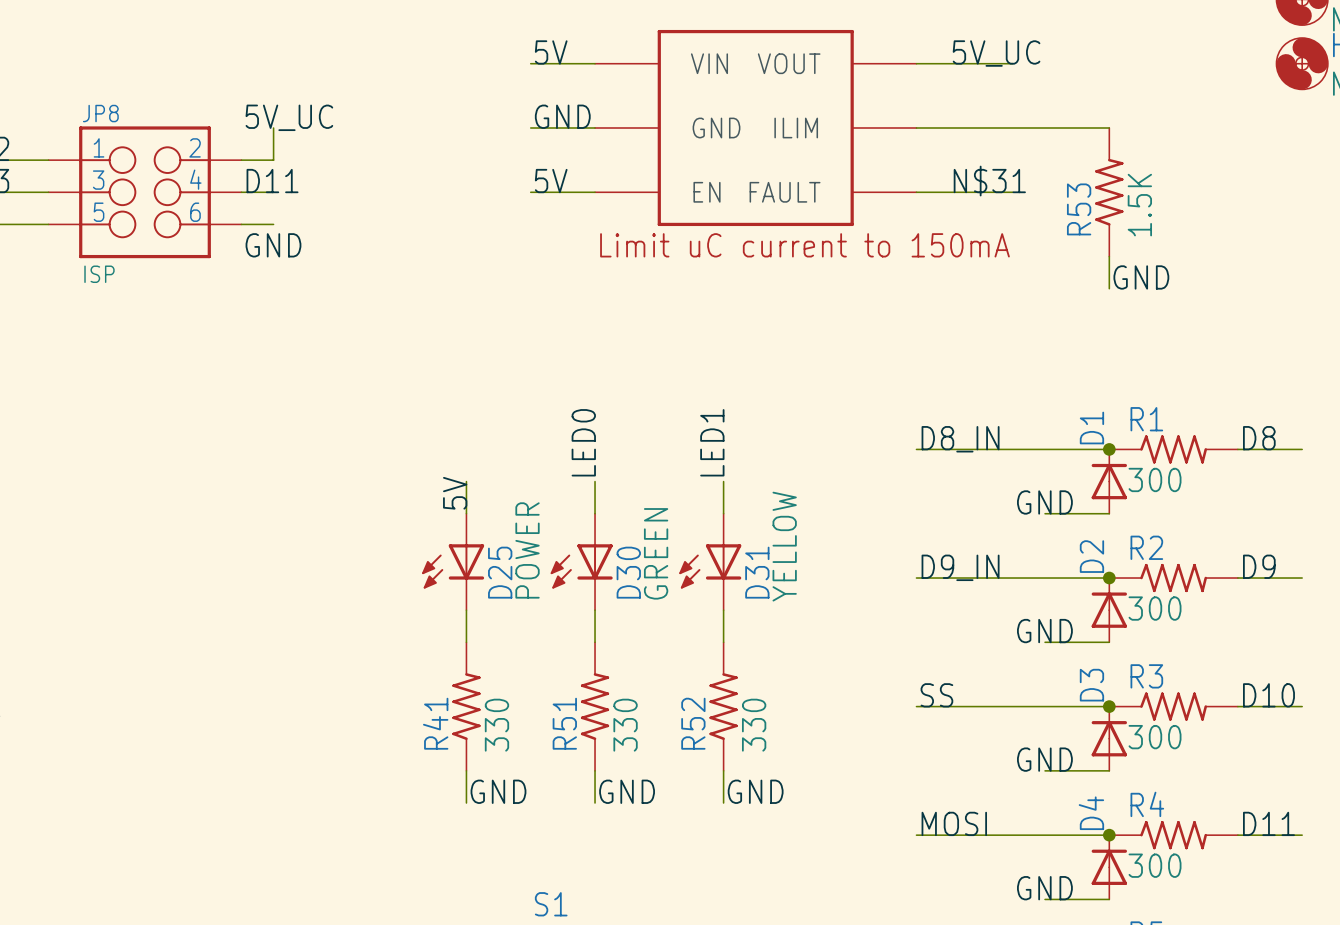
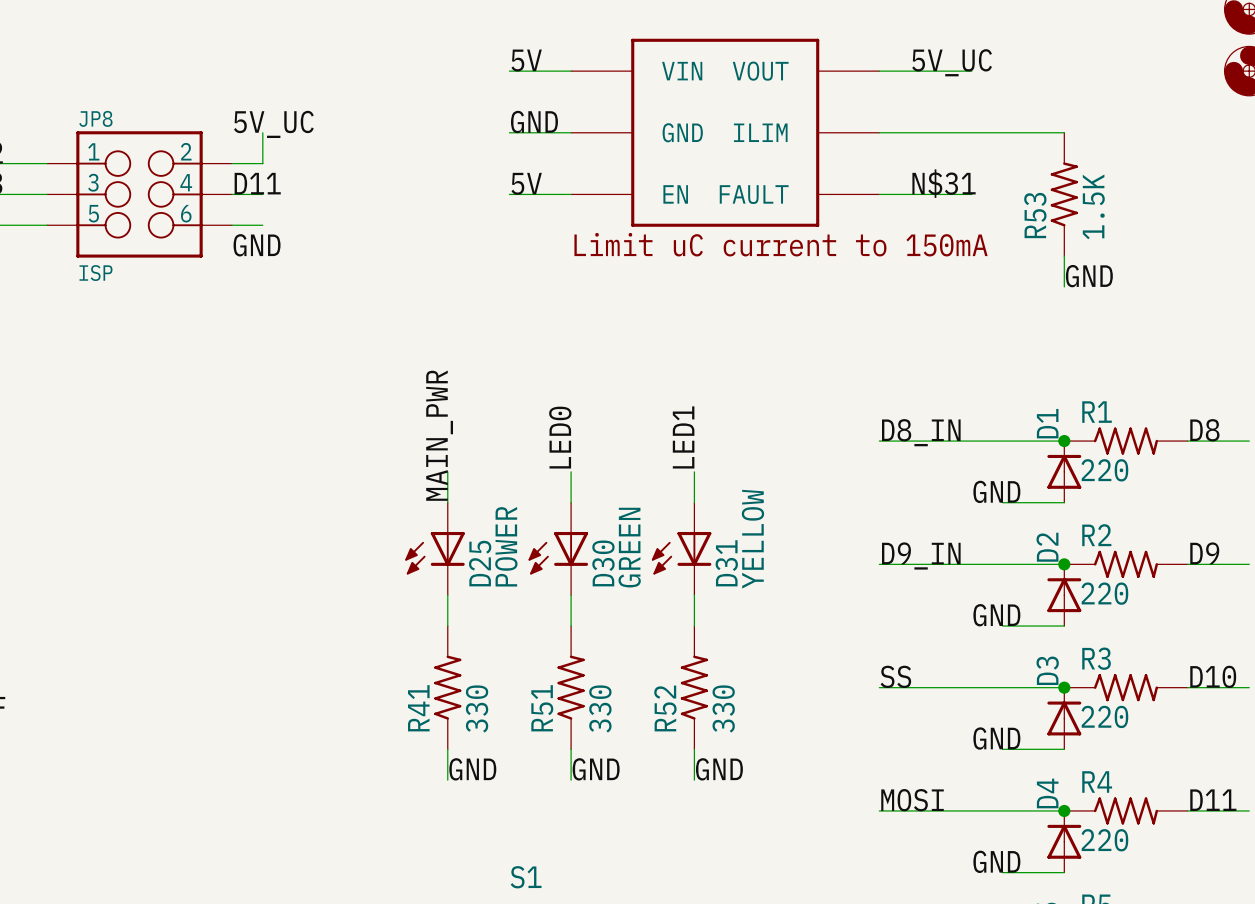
R1 value: 300 (1155, 479) -> 220 (1104, 470)
label: 5V (455, 493) -> MAIN_PWR (439, 435)
R2 value: 300 (1155, 608) -> 220 (1104, 593)
R3 value: 300 (1155, 737) -> 220 (1104, 716)
R4 value: 300 (1155, 865) -> 220 (1104, 840)

